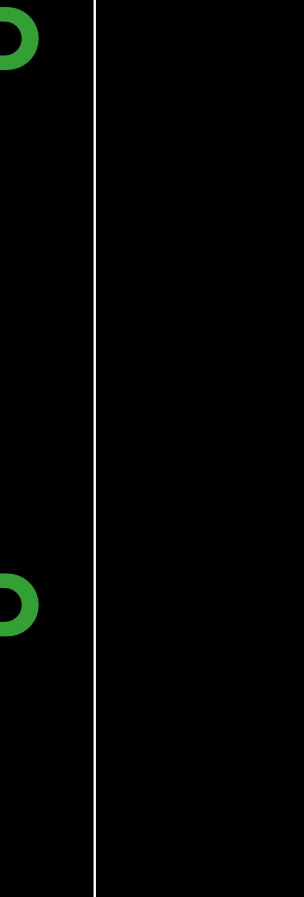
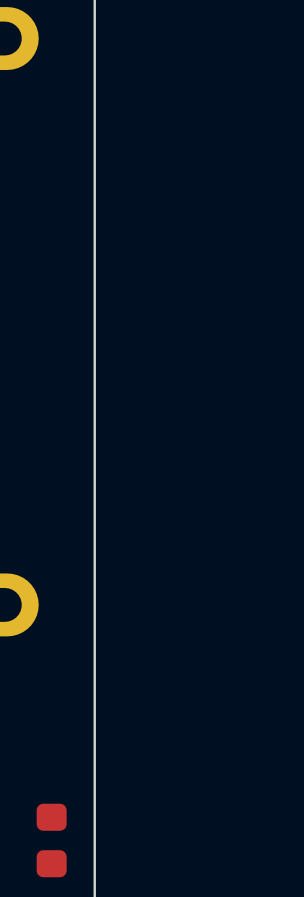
part: none -> (51, 840)

